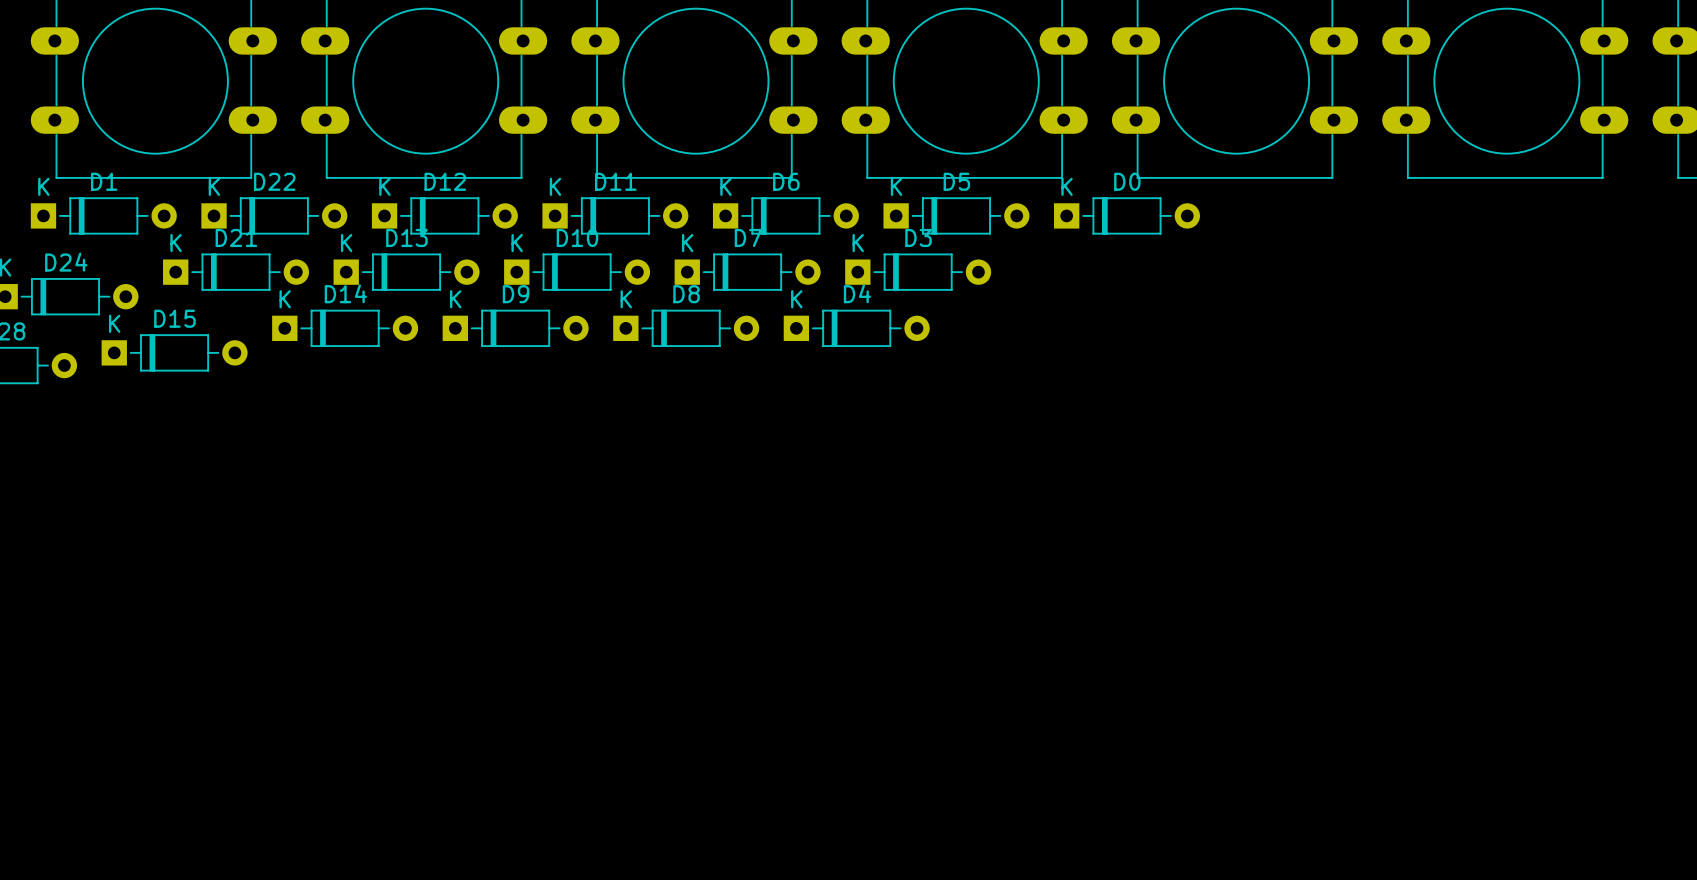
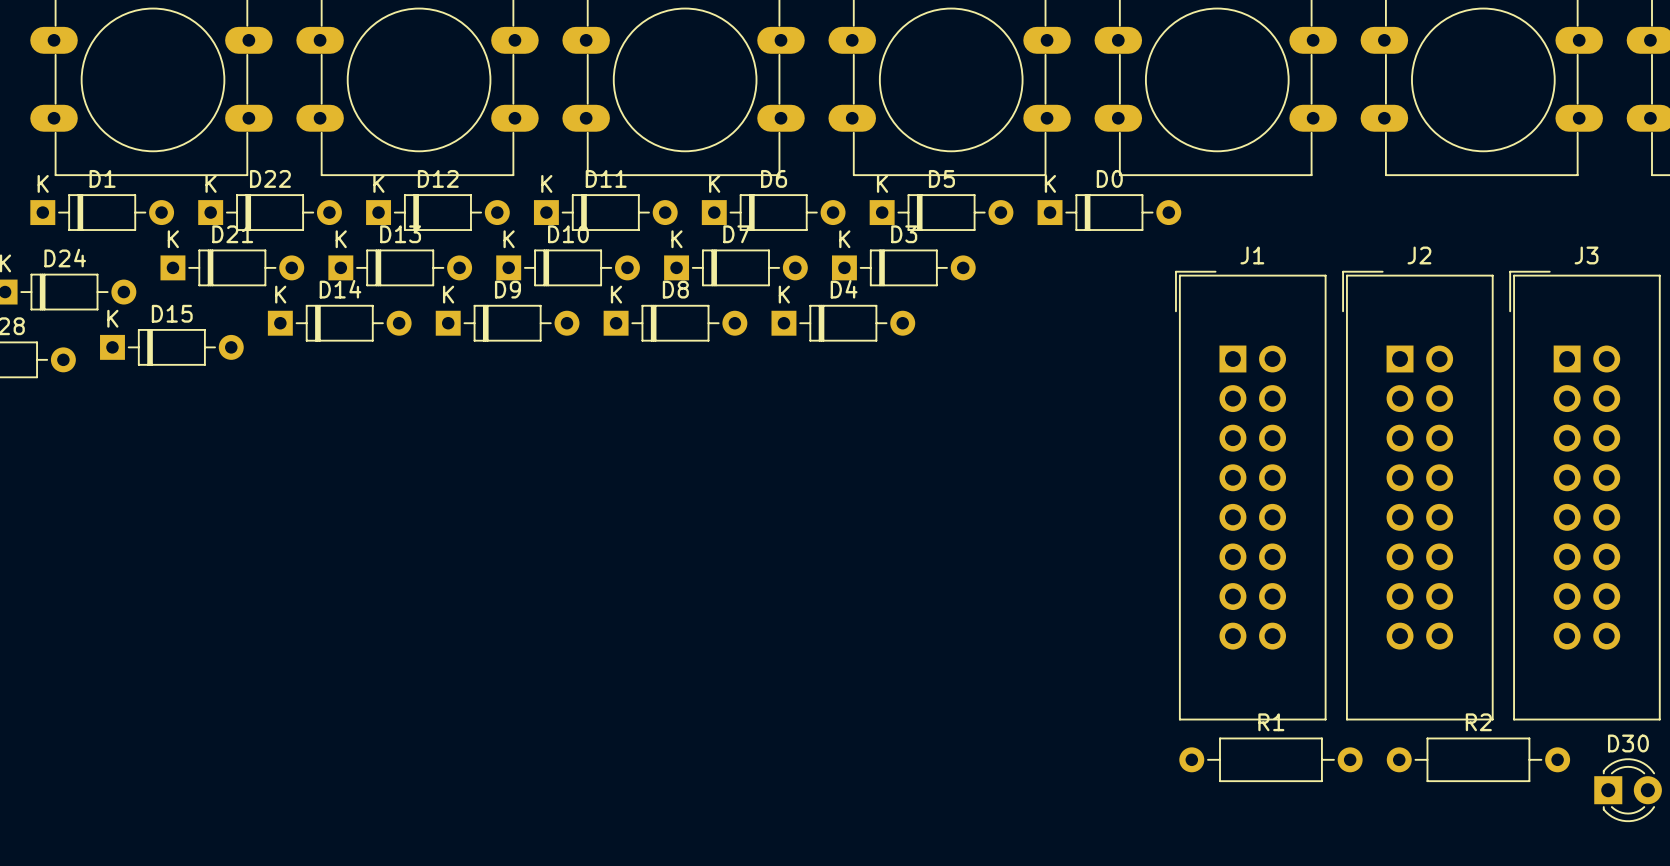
J1: none -> (1250, 495)
J2: none -> (1417, 495)
J3: none -> (1584, 495)
R1: none -> (1270, 759)
R2: none -> (1478, 759)
D30: none -> (1628, 790)

